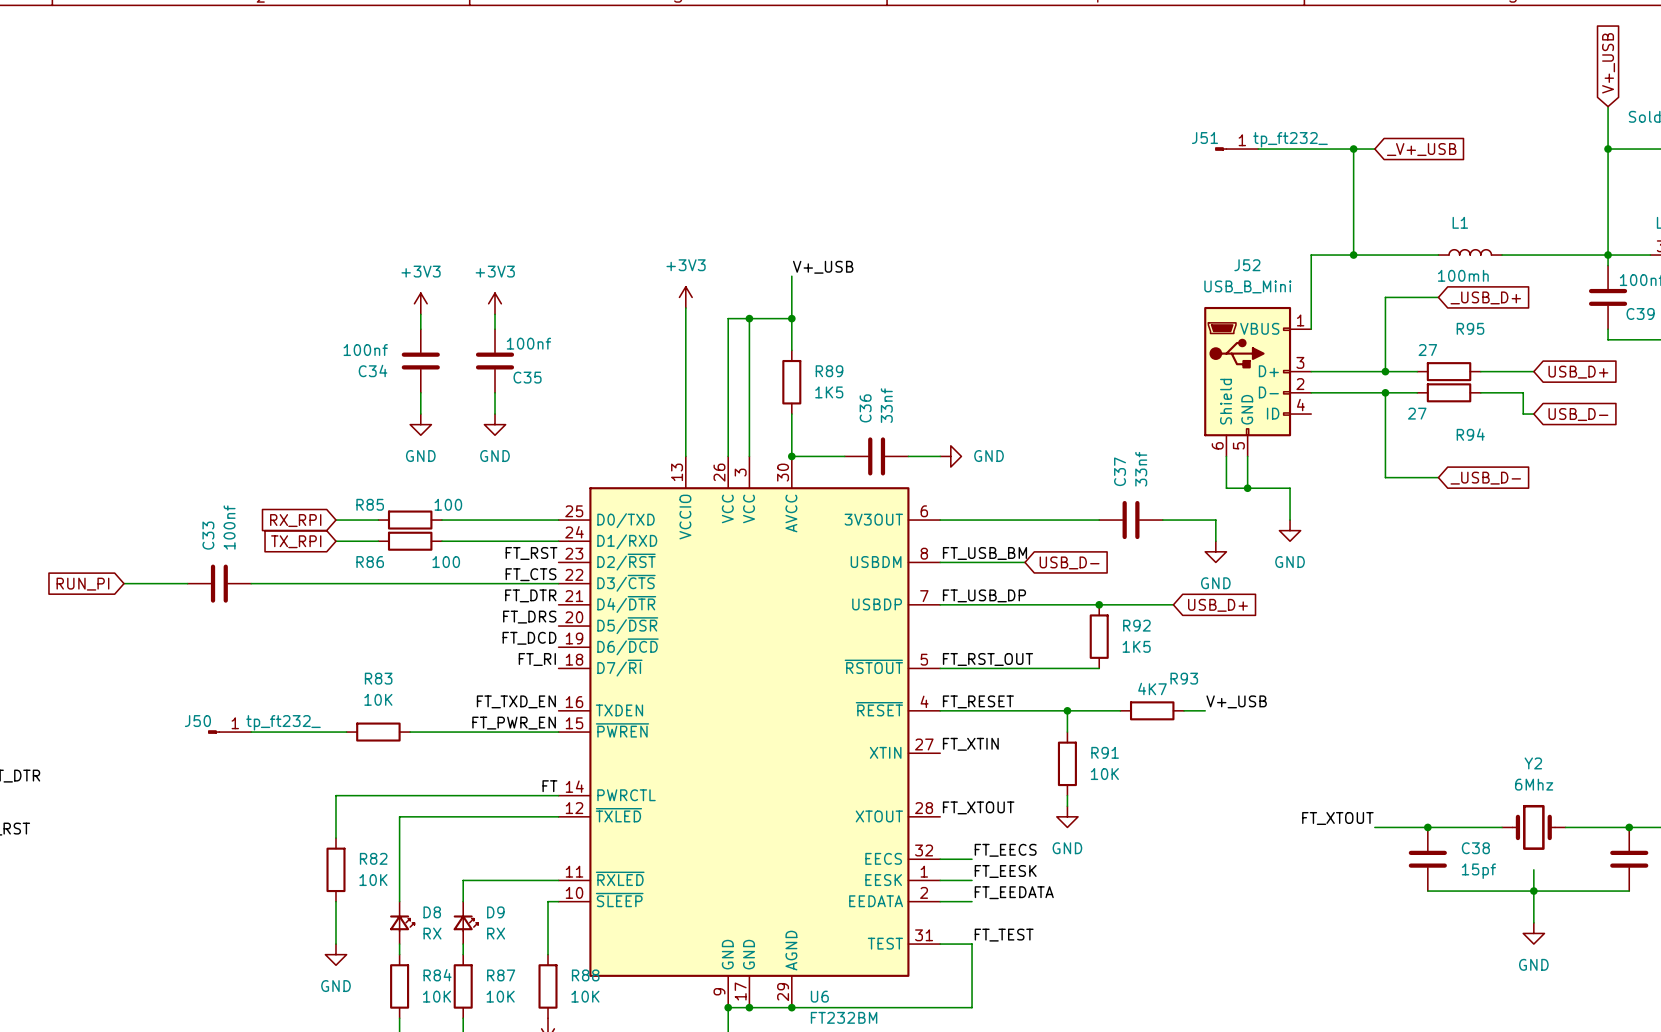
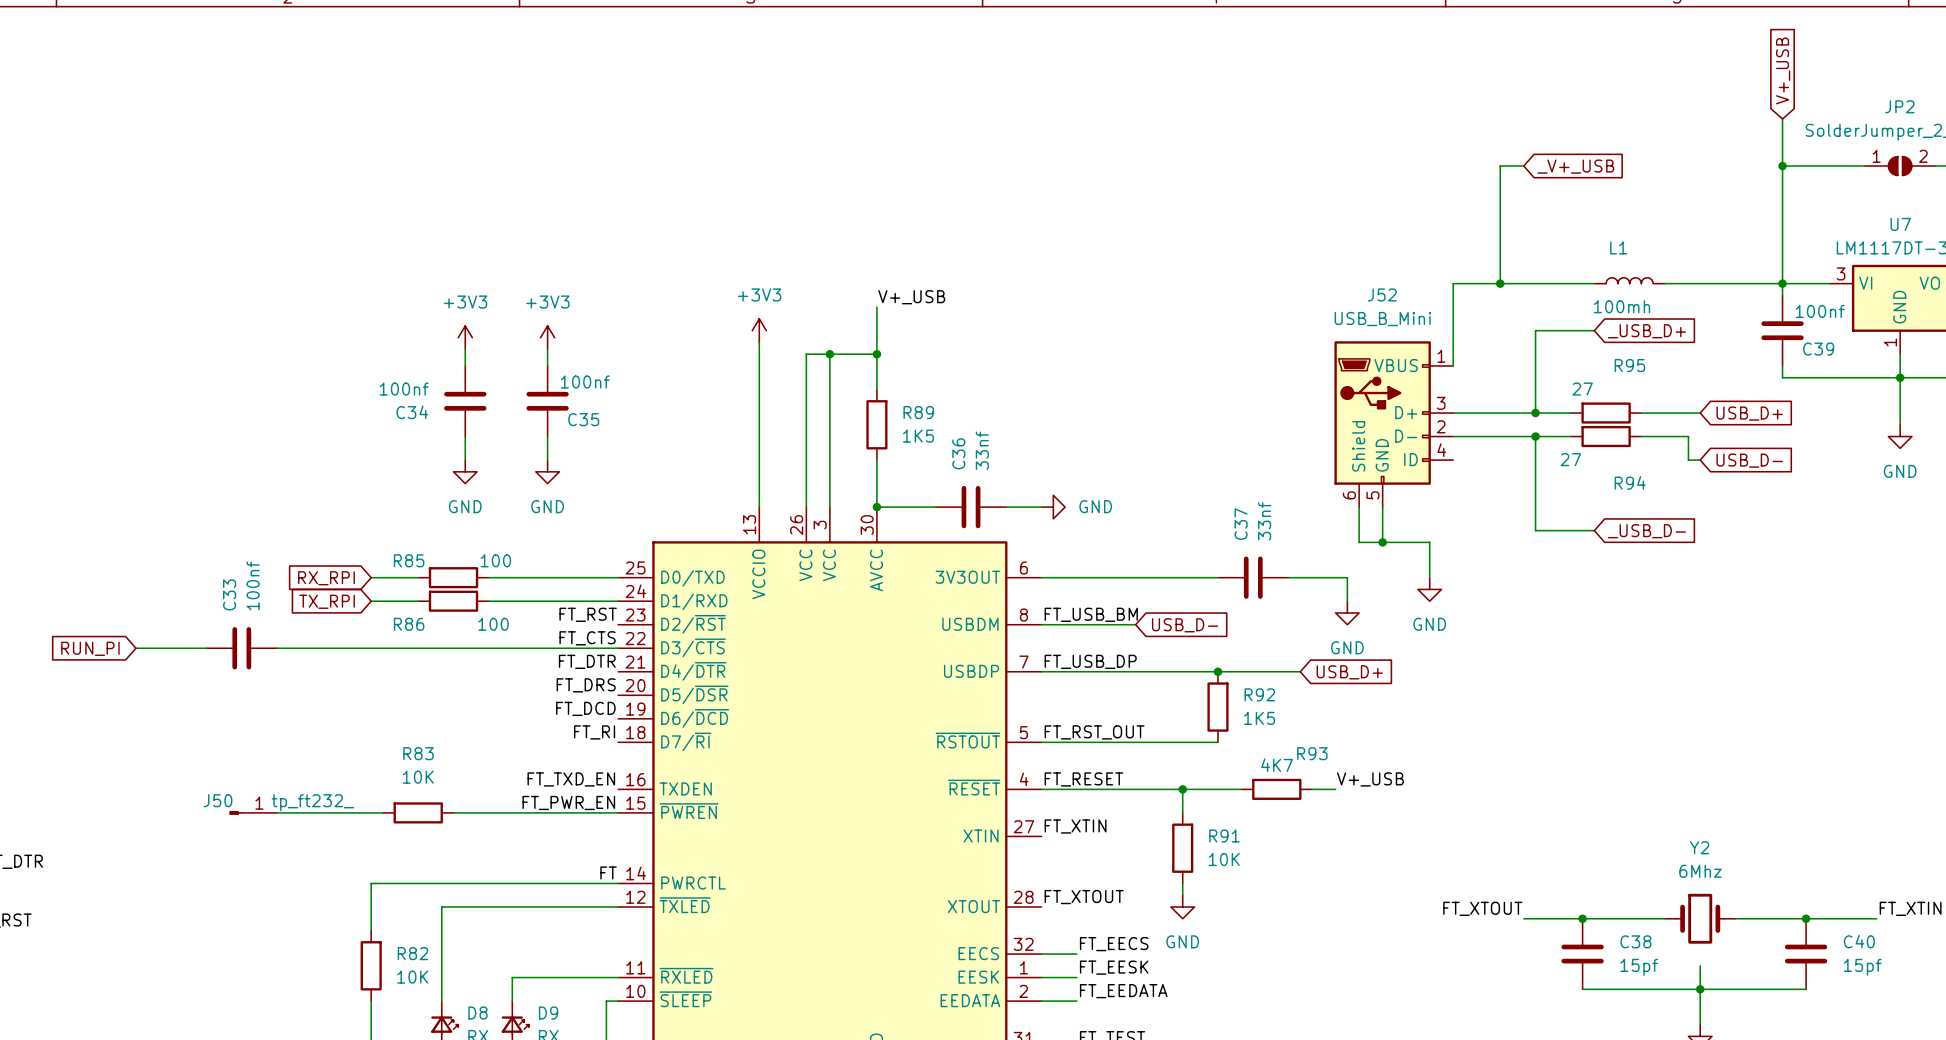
J51: tp_ft232_ (1236, 149) -> none
wire: (1258, 149) (1353, 149) -> none
junction: (1353, 149) -> none

